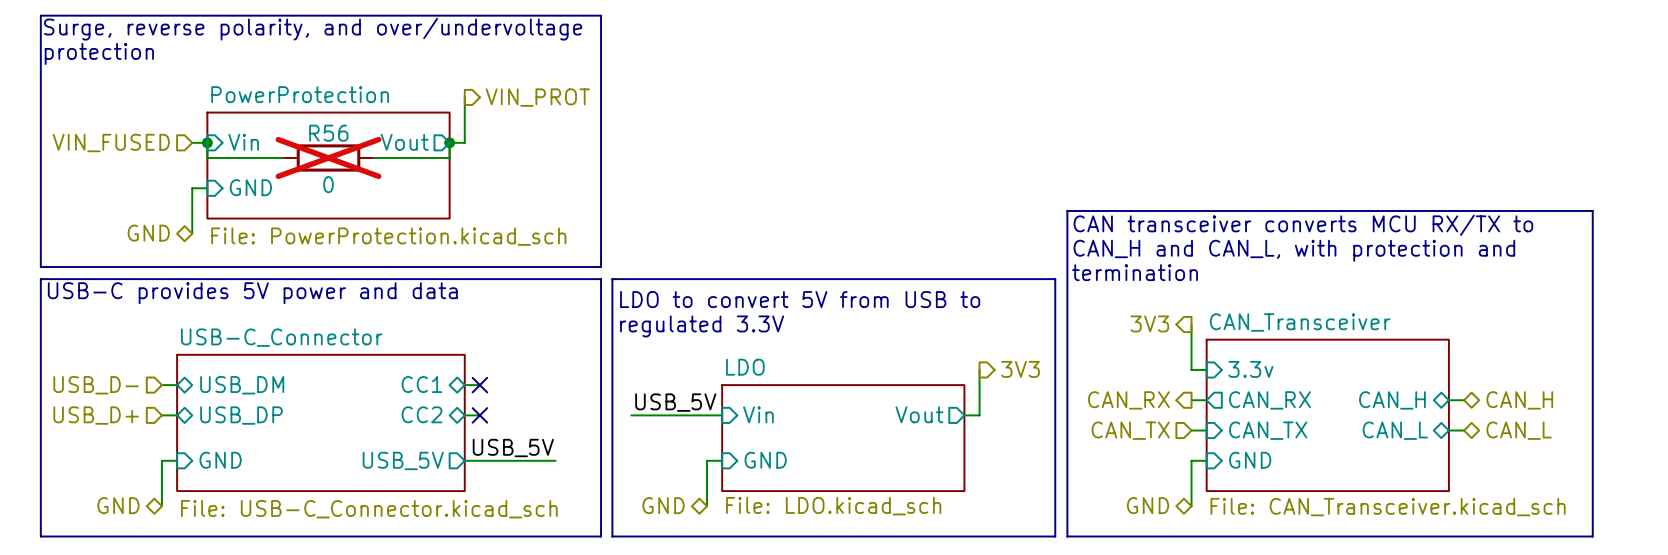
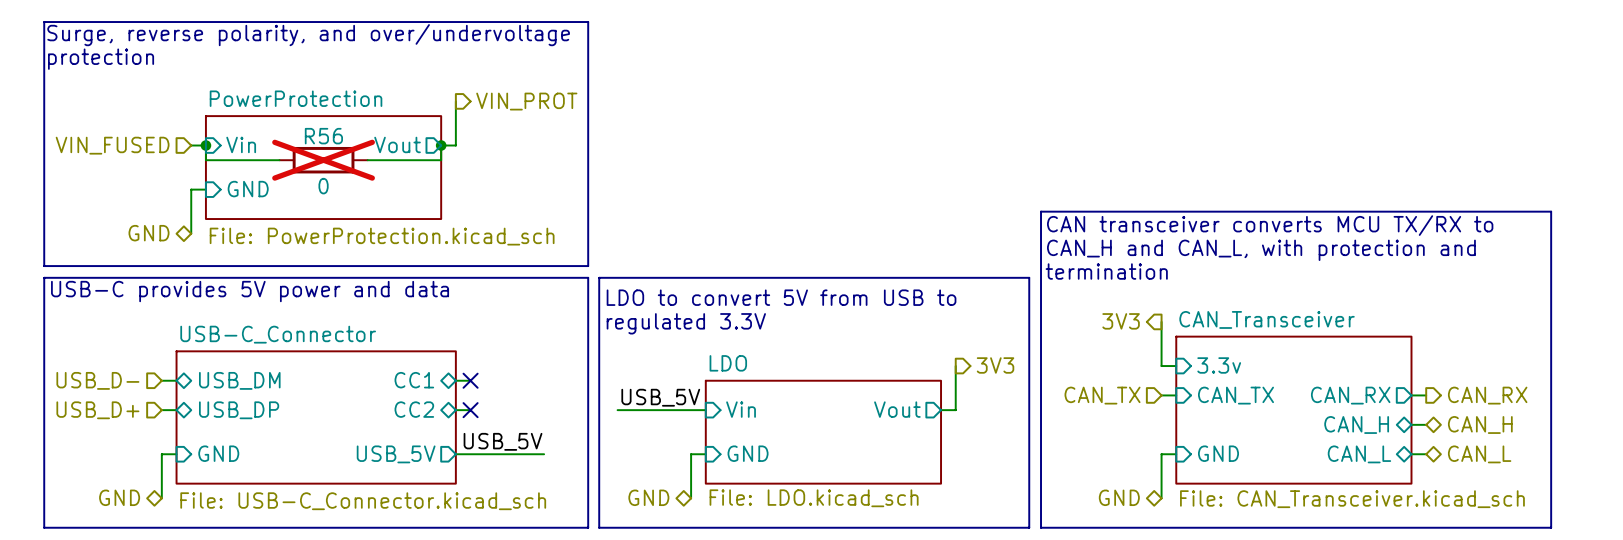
text: CAN transceiver converts MCU RX/TX to (1303, 225) -> CAN transceiver converts MCU TX/RX to (1270, 225)
hierarchical label shape: output (1128, 400) -> input (1102, 395)
hierarchical label: CAN_RX (1128, 400) -> CAN_TX (1102, 395)
sheet pin shape: output (1269, 400) -> input (1236, 395)
sheet pin: CAN_RX (1269, 400) -> CAN_TX (1236, 395)
sheet pin shape: bidirectional (1392, 400) -> output (1350, 395)
sheet pin: CAN_H (1392, 400) -> CAN_RX (1350, 395)
hierarchical label shape: bidirectional (1519, 400) -> output (1487, 395)
hierarchical label: CAN_H (1519, 400) -> CAN_RX (1487, 395)
hierarchical label: CAN_TX (1130, 430) -> none
wire: (1191, 430) (1206, 430) -> (1411, 454) (1426, 454)
sheet pin: CAN_TX (1268, 430) -> none
sheet pin: CAN_L (1395, 430) -> CAN_H (1356, 424)
hierarchical label: CAN_L (1519, 430) -> CAN_H (1480, 424)
sheet pin: none -> CAN_L (1359, 454)
hierarchical label: none -> CAN_L (1479, 454)

